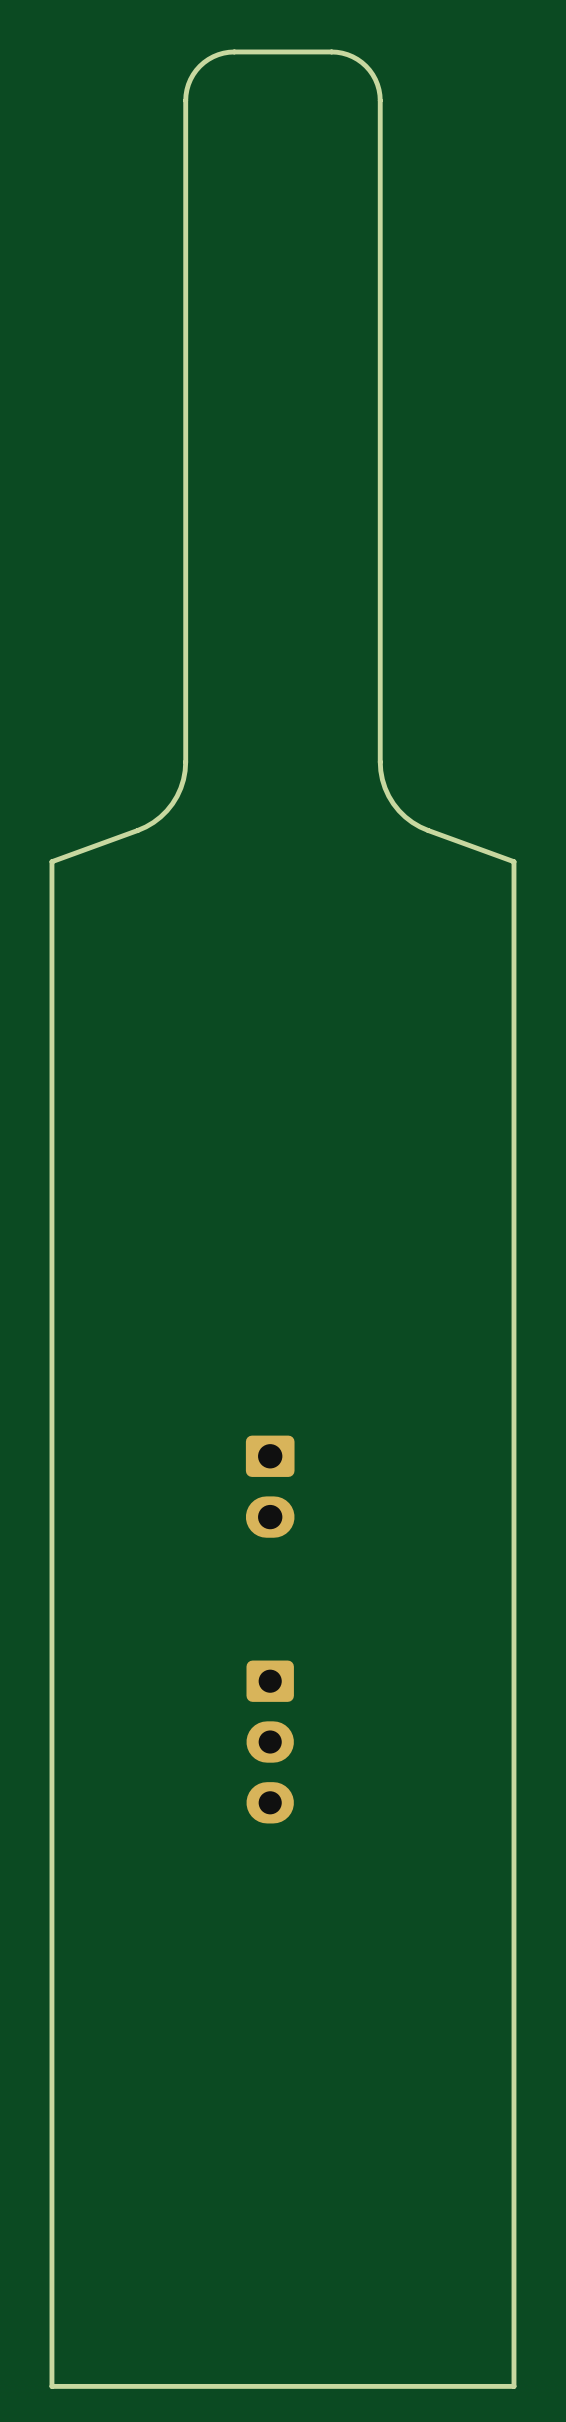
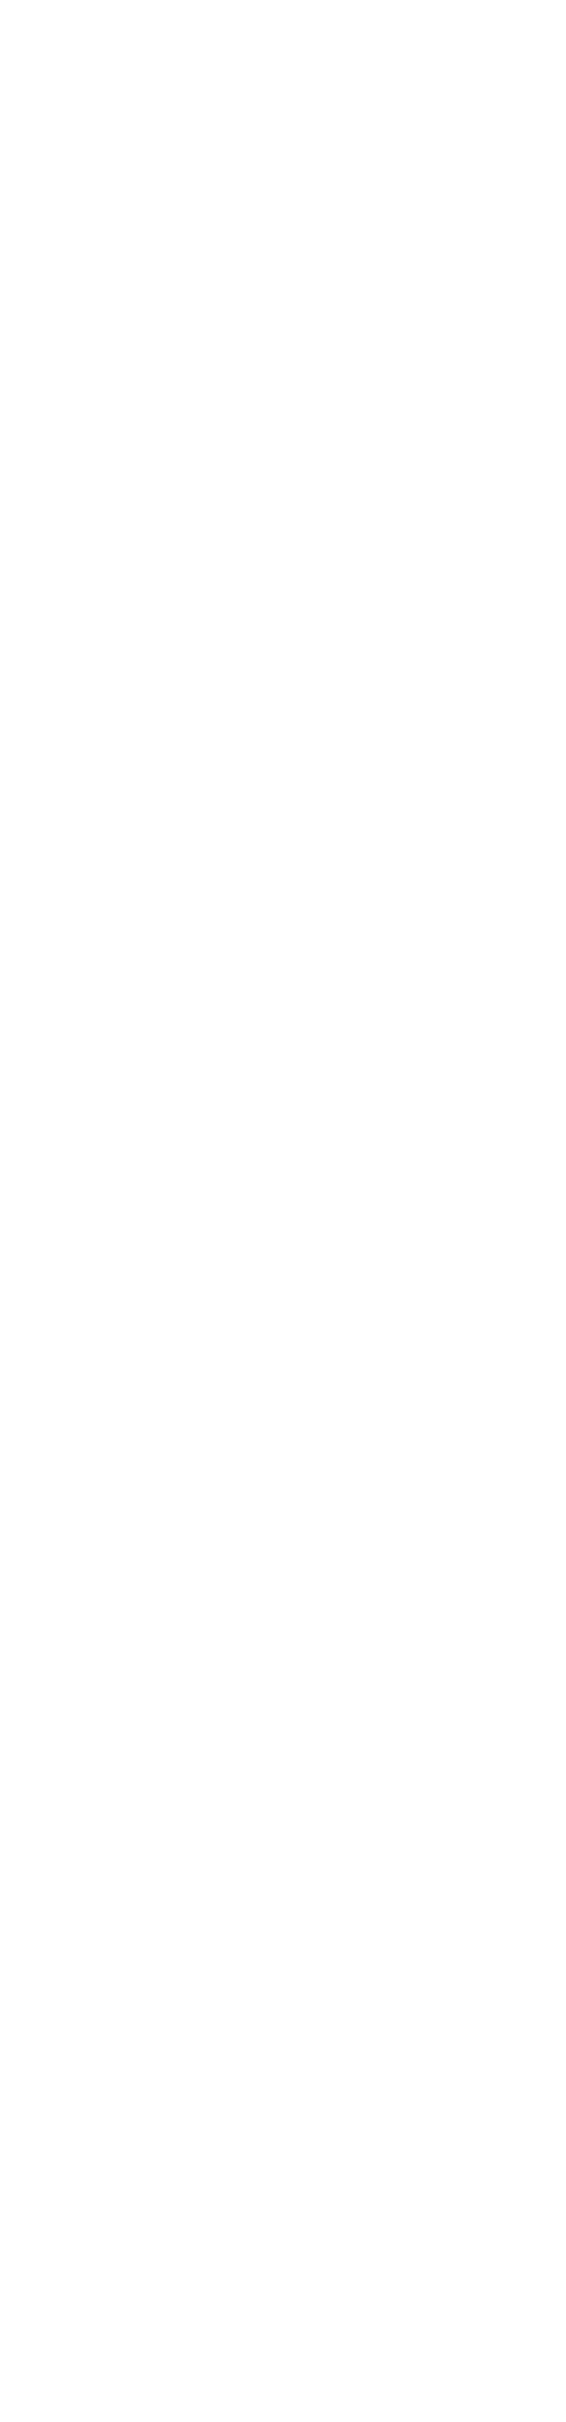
board edge: (331, 51) (223, 53) (208, 59) (199, 66) (188, 84) (185, 100) (185, 770) (177, 796) (166, 810) (153, 822) (137, 830) (51, 861) (51, 2386) (513, 2386) (513, 861) (428, 830) (412, 822) (393, 803) (382, 779) (380, 761) (379, 95) (375, 79) (361, 62) (347, 54) (331, 51) -> none
part: (270, 1486) -> none
part: (270, 1742) -> none

